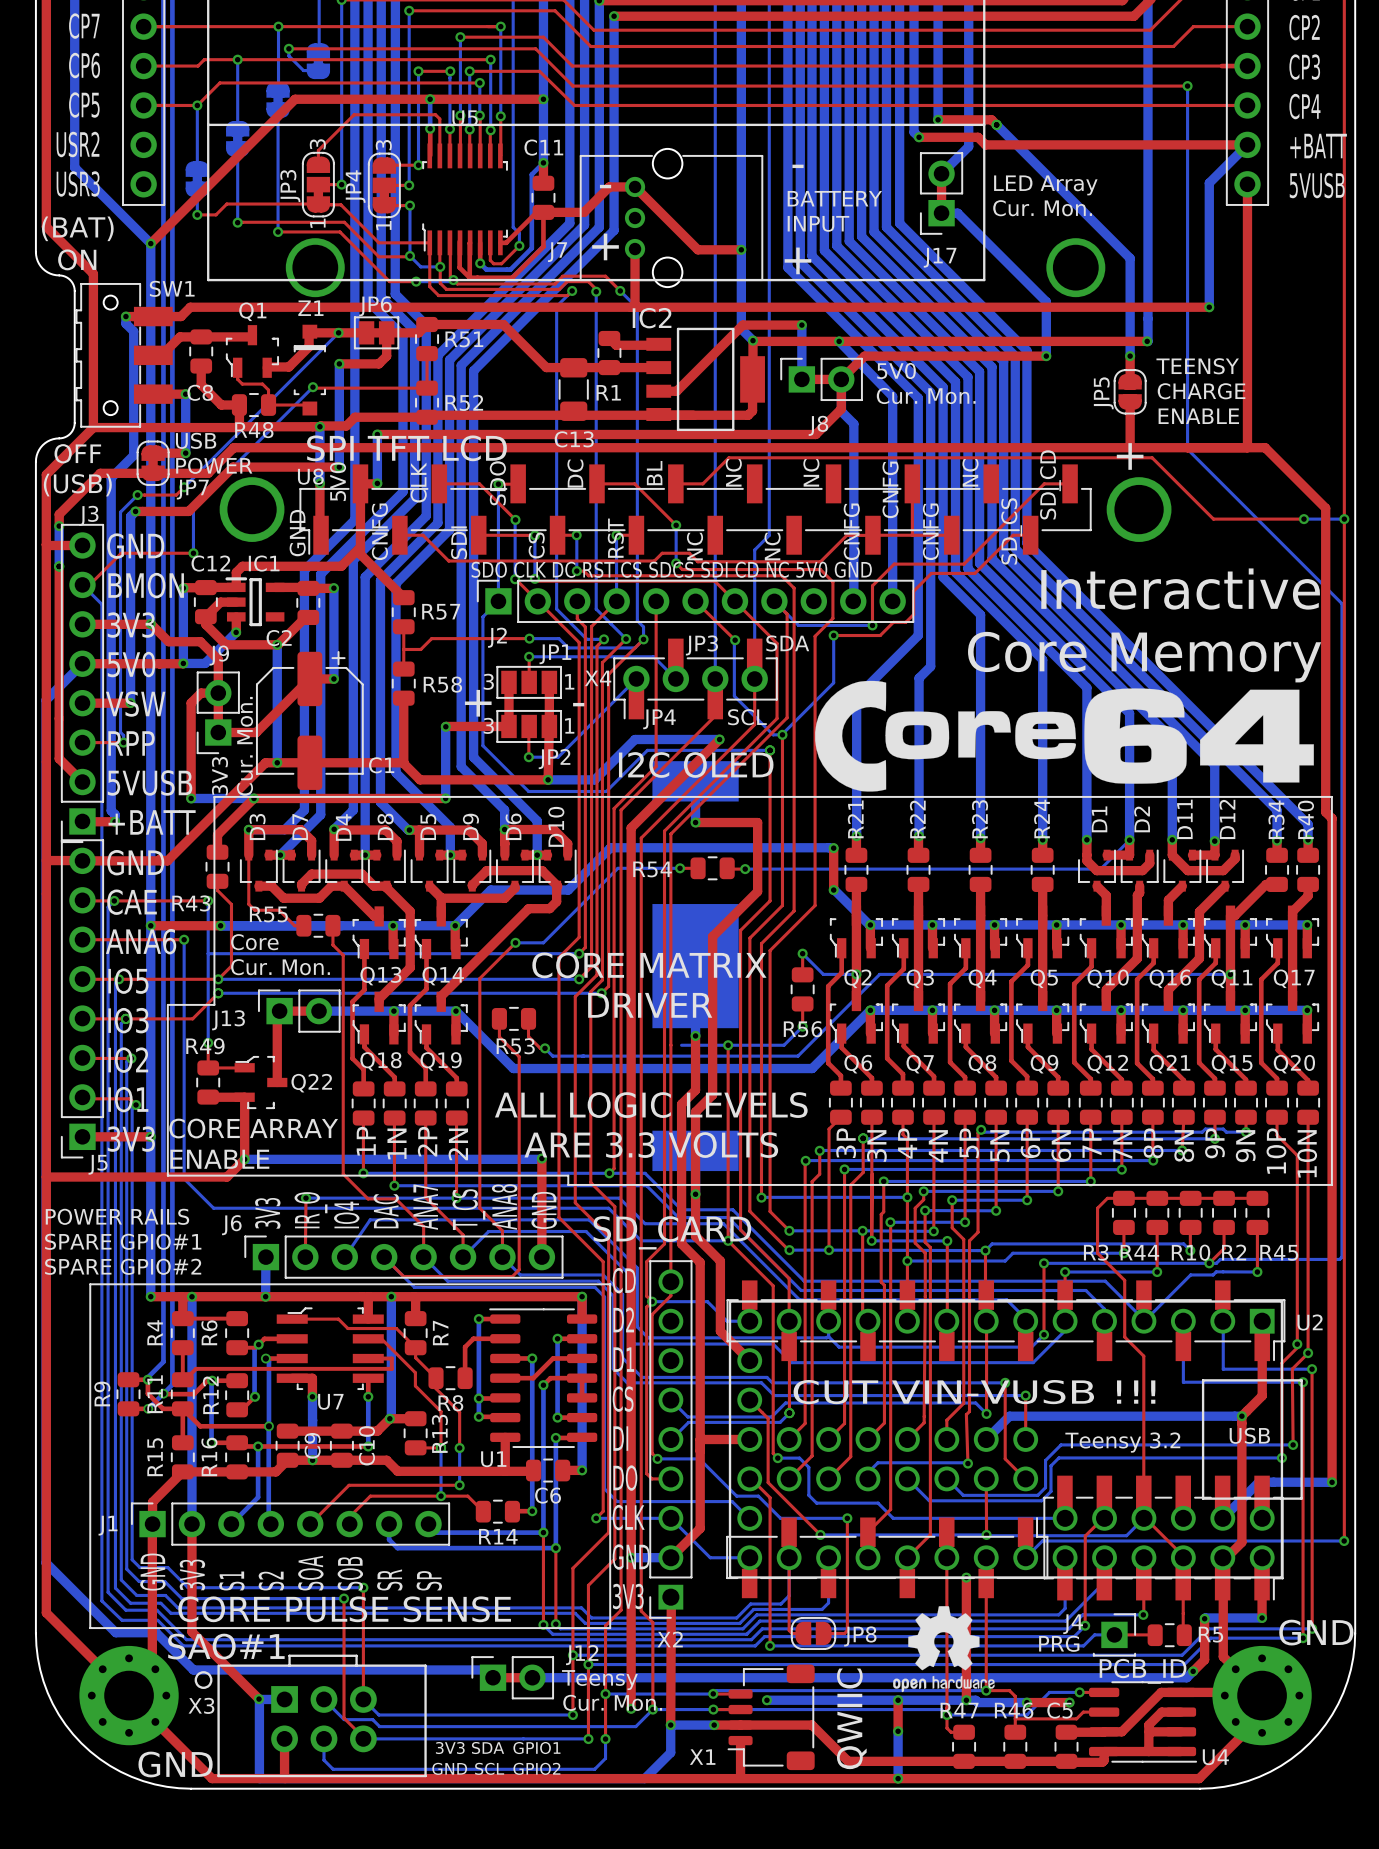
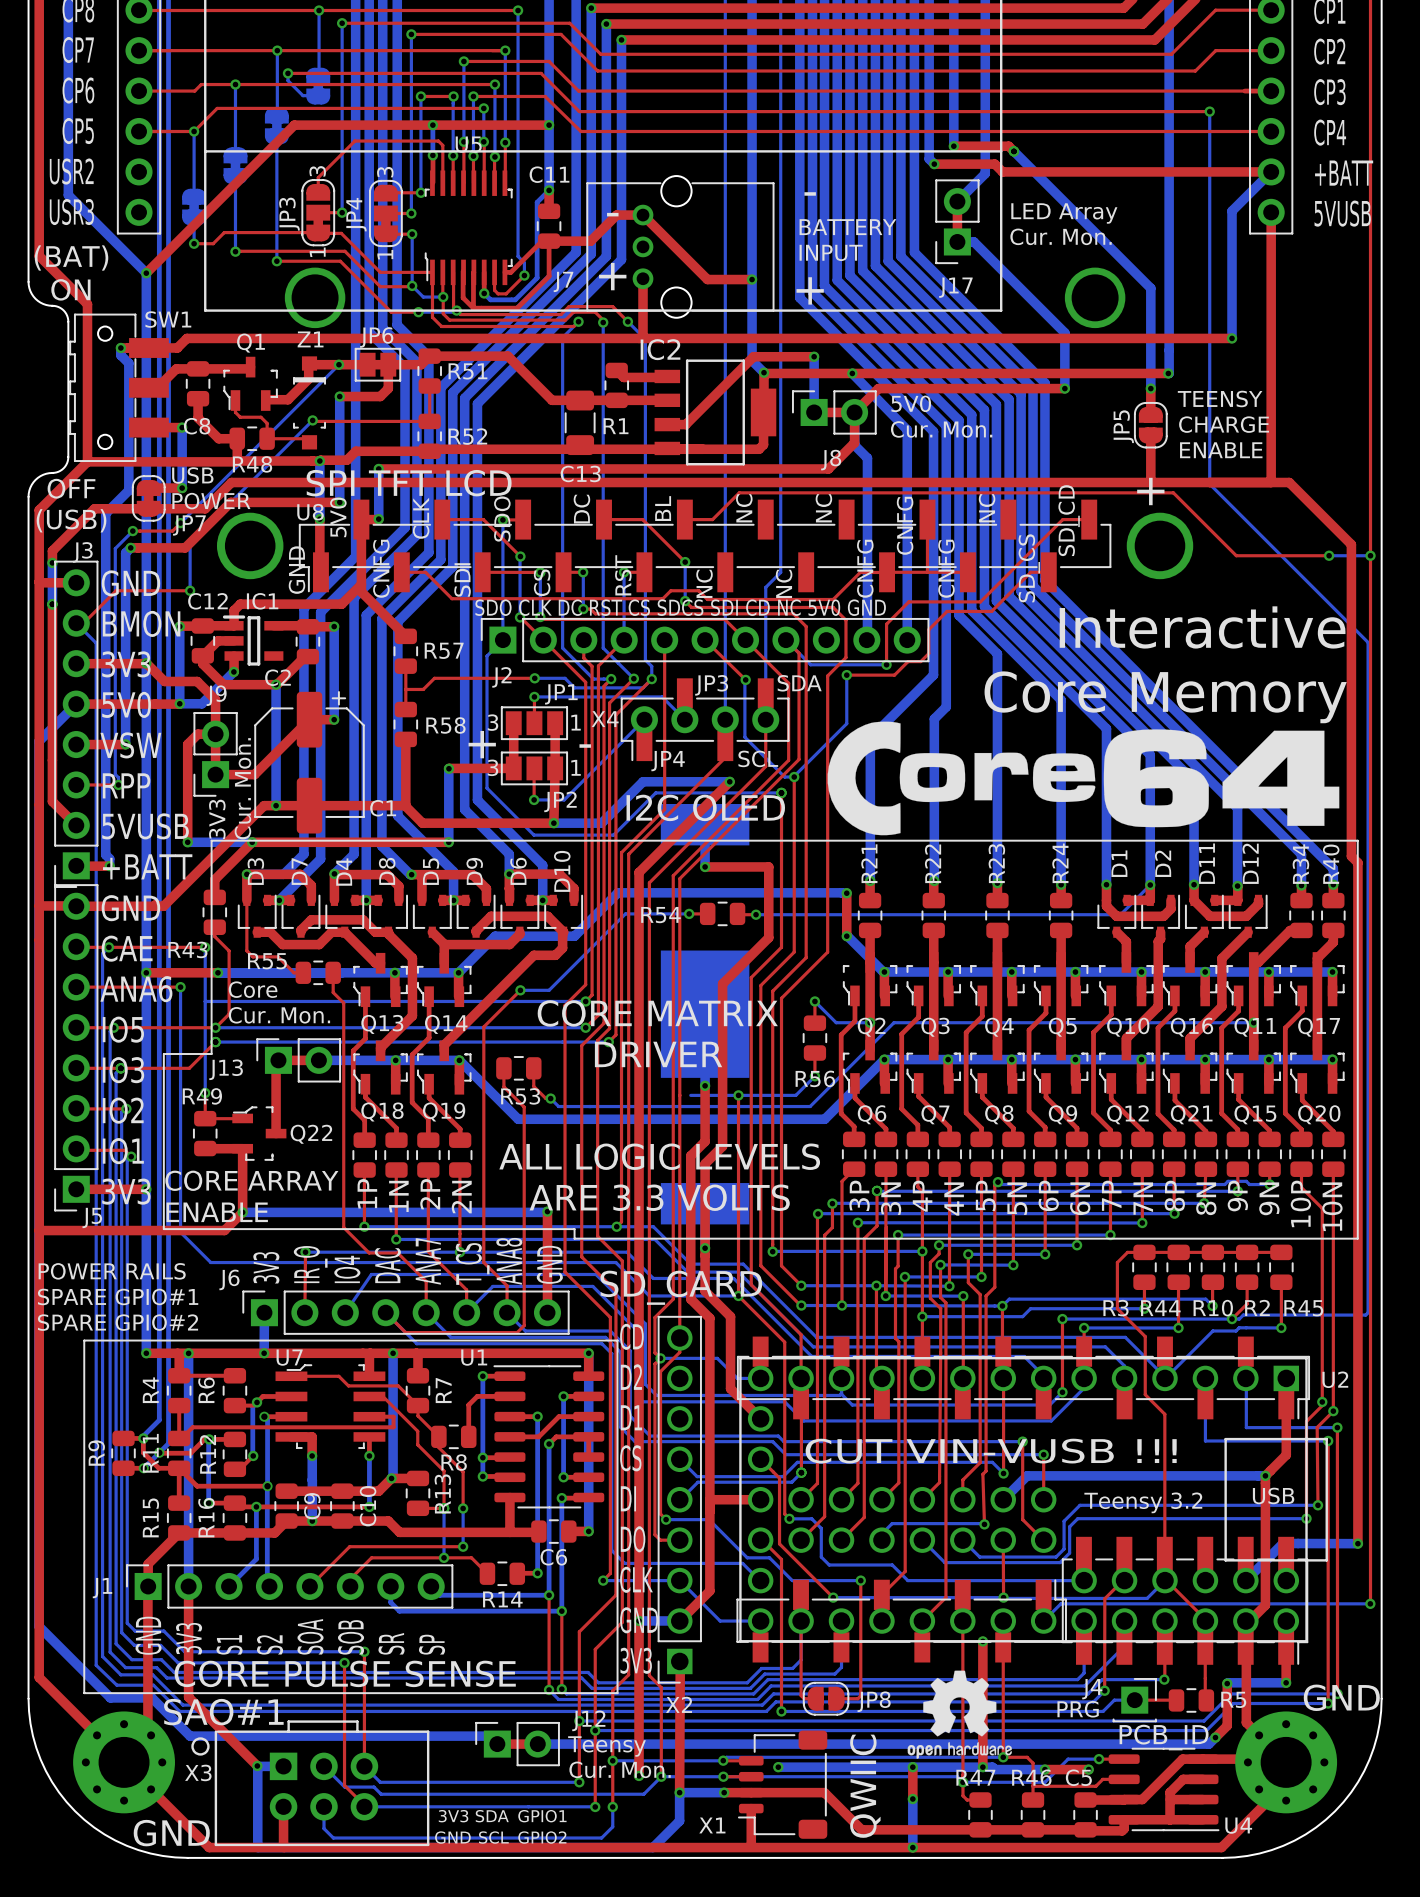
U7 name position: U7 (330, 1401) -> U7 (289, 1357)
U1 name position: U1 (493, 1459) -> U1 (474, 1357)

